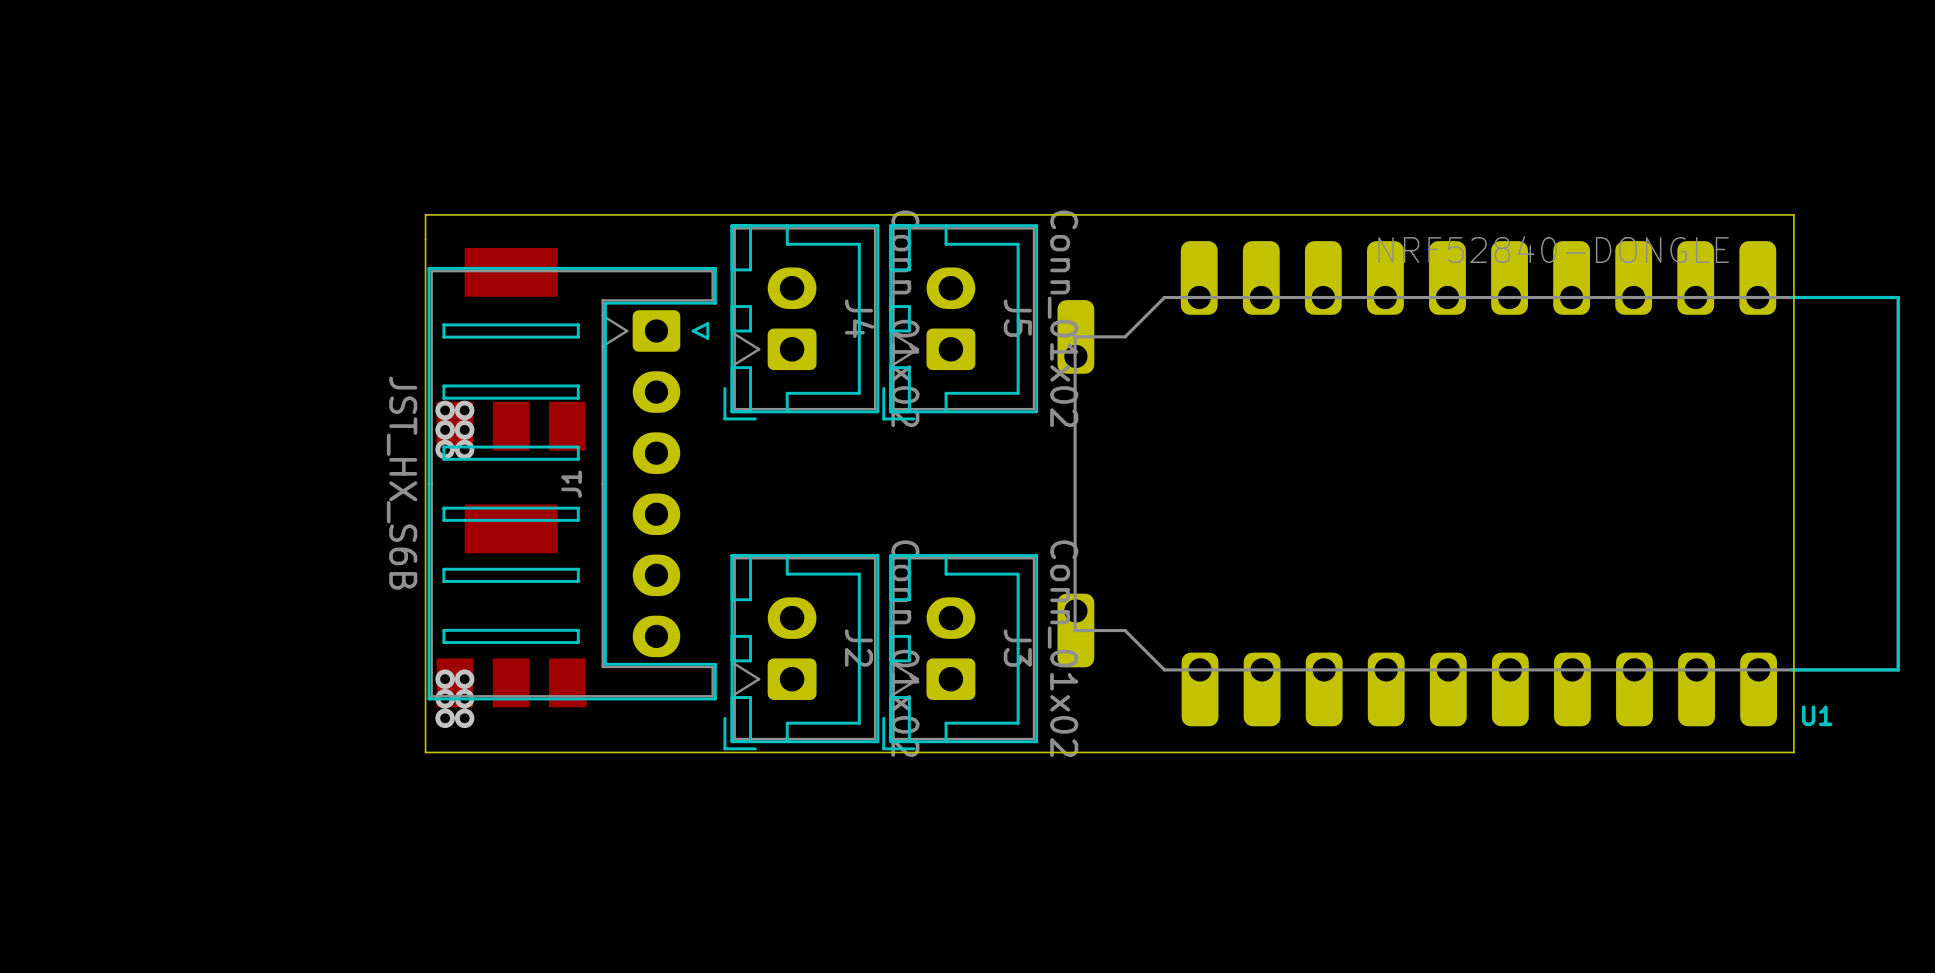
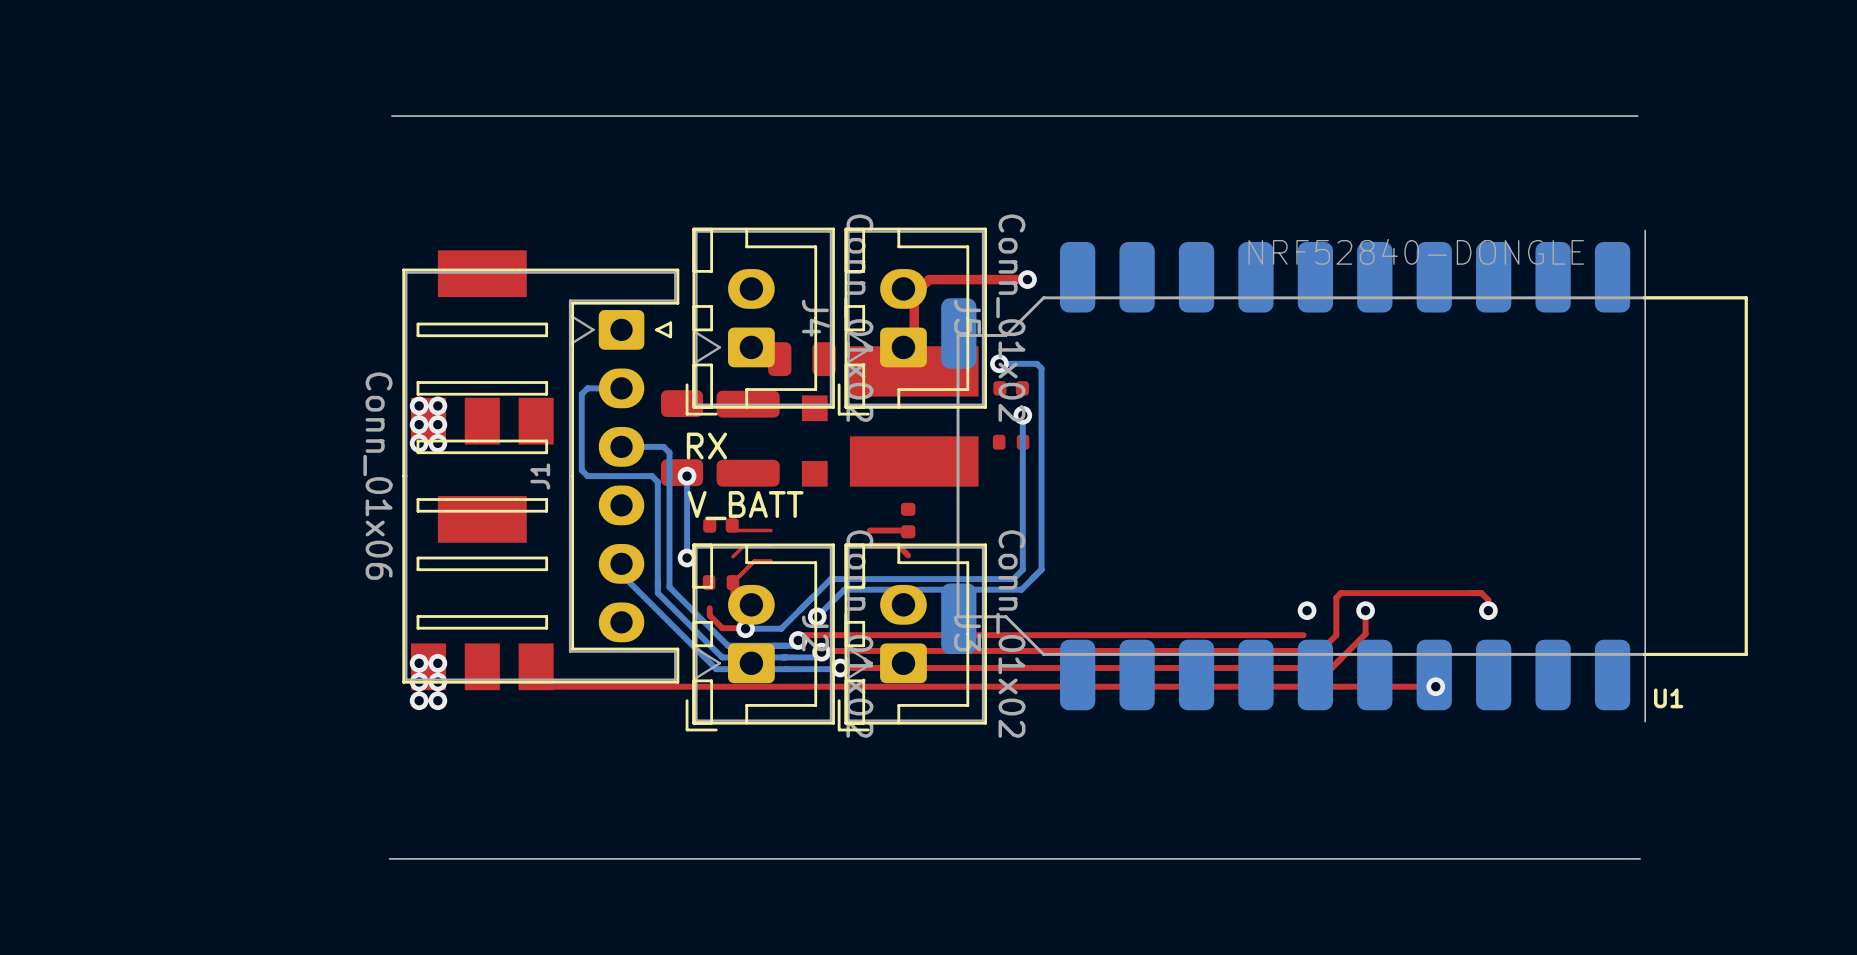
board edge: none -> (1637, 116) (391, 116)
board edge: (1793, 214) (1793, 752) (425, 752) (425, 214) (1793, 214) -> none
board edge: none -> (1645, 230) (1645, 721)
U1 footprint: [1057, 241, 1900, 727] -> [941, 241, 1748, 711]
top track: none -> (1027, 279) (929, 279) (914, 294) (914, 371)
via: none -> (1027, 279)
part: none -> (801, 359)
bottom track: none -> (999, 363) (1036, 363) (1041, 368) (1041, 569) (1021, 589) (844, 589) (817, 616)
via: none -> (999, 363)
bottom track: none -> (621, 388) (587, 388) (581, 394) (581, 470) (587, 476) (651, 476) (657, 481) (657, 593) (722, 657) (816, 657) (821, 652)
part: none -> (1011, 388)
bottom track: none -> (1022, 415) (1022, 569) (1013, 579) (830, 579) (781, 628) (745, 628)
via: none -> (1022, 415)
part: none -> (914, 416)
part: none -> (682, 438)
part: none -> (748, 438)
part: none -> (814, 441)
part: none -> (1011, 442)
text: none -> RX (706, 445)
bottom track: none -> (621, 446) (663, 446) (669, 452) (669, 587) (727, 645) (792, 645) (798, 640)
J1 value: JST_HX_S6B (402, 483) -> Conn_01x06 (377, 476)
bottom track: none -> (687, 476) (687, 558)
via: none -> (687, 476)
text: none -> V_BATT (745, 505)
part: none -> (908, 520)
part: none -> (720, 525)
top track: none -> (732, 525) (737, 530) (770, 530)
top track: none -> (869, 530) (908, 531)
top track: none -> (770, 545) (744, 545) (732, 556)
top track: none -> (869, 545) (898, 545) (908, 555)
via: none -> (687, 558)
top track: none -> (770, 560) (754, 560) (732, 583) (732, 608) (755, 608)
bottom track: none -> (621, 574) (716, 669) (840, 667)
part: none -> (720, 582)
top track: none -> (709, 608) (709, 615) (722, 628) (745, 628)
via: none -> (1307, 610)
top track: none -> (1365, 610) (1365, 634) (1331, 667) (840, 667)
via: none -> (1365, 610)
top track: none -> (1486, 610) (1488, 610) (1488, 600) (1481, 593) (1341, 593) (1336, 597) (1336, 635) (1320, 650) (821, 652)
via: none -> (1488, 610)
via: none -> (817, 616)
via: none -> (745, 628)
top track: none -> (1303, 635) (803, 635)
via: none -> (798, 640)
via: none -> (821, 652)
via: none -> (840, 667)
top track: none -> (1435, 686) (552, 686)
via: none -> (1435, 686)
board edge: none -> (1640, 858) (389, 858)

